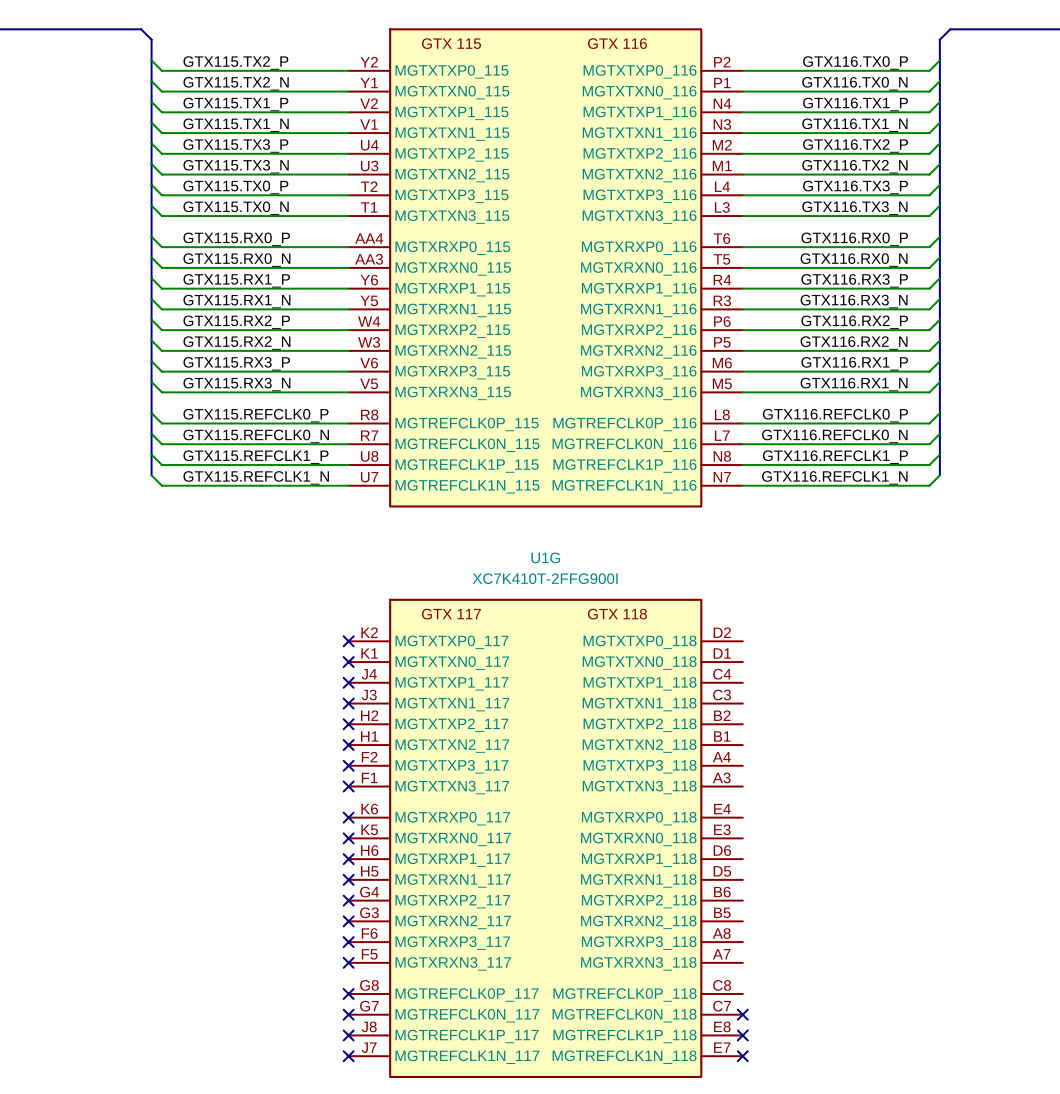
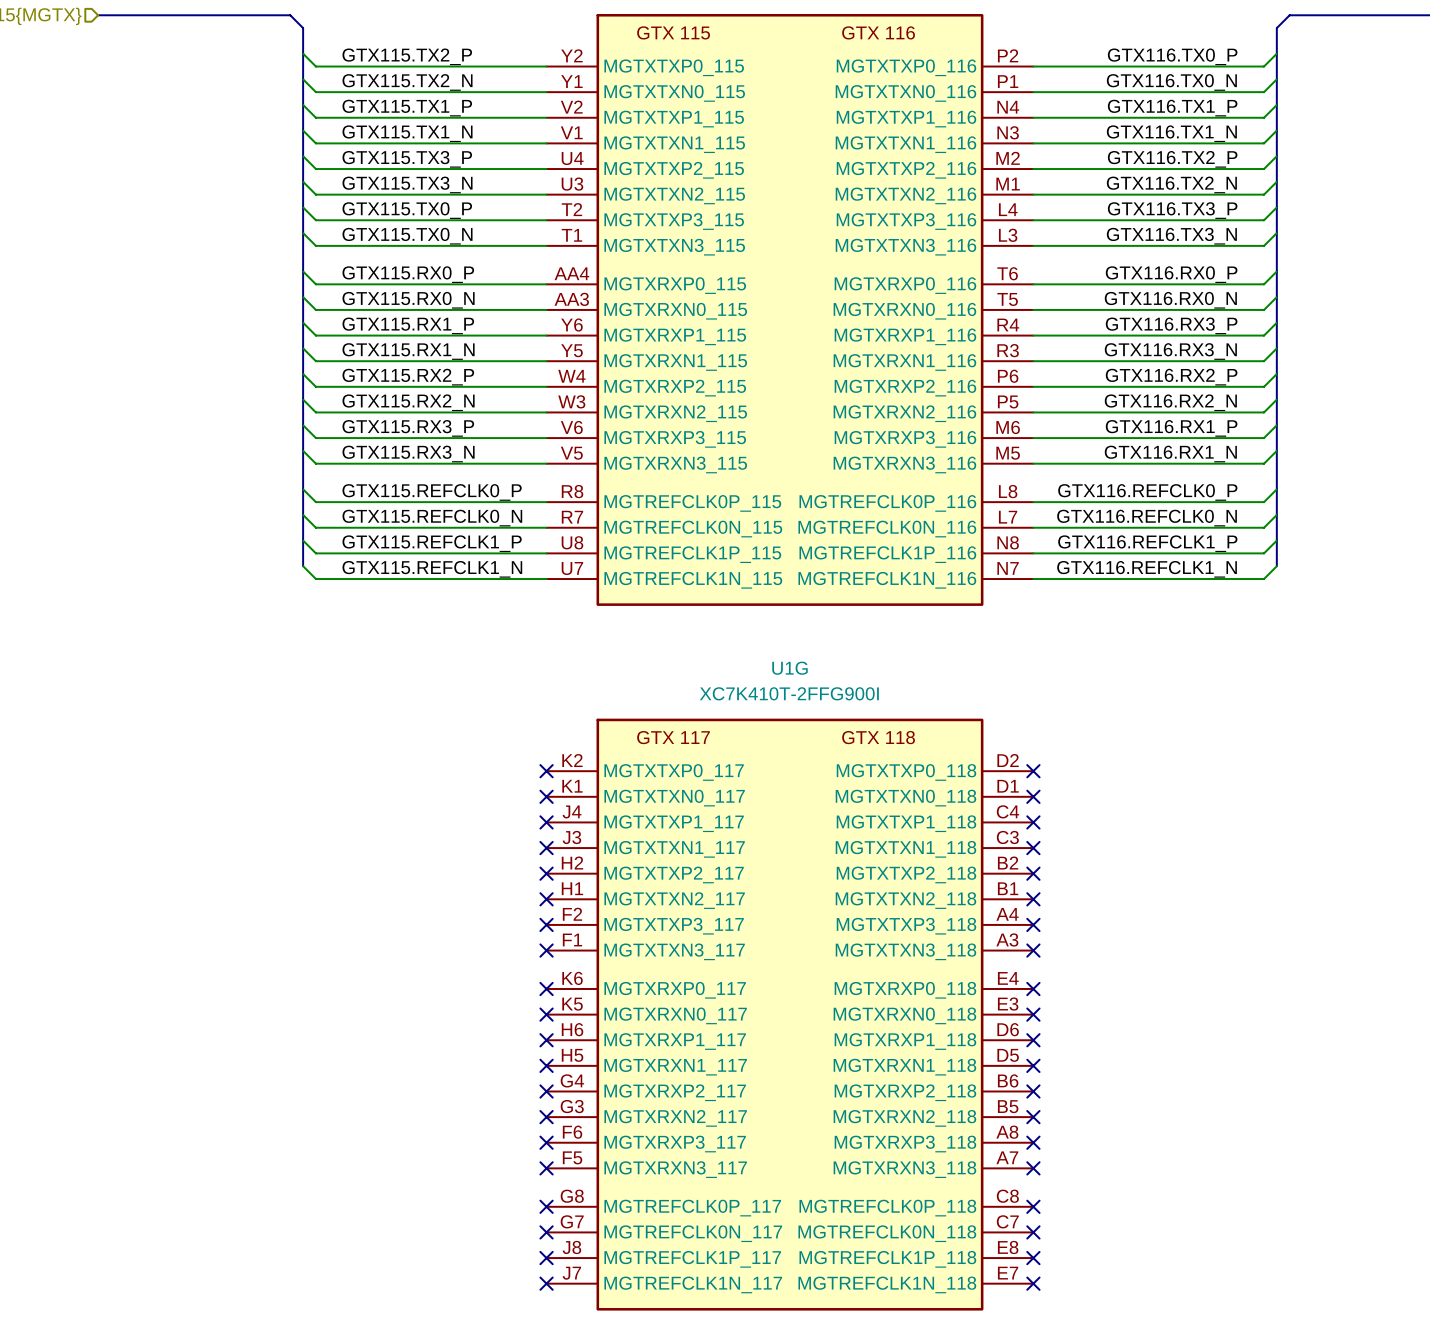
no-connect mark: none -> (1033, 771)
no-connect mark: none -> (1033, 796)
no-connect mark: none -> (1033, 822)
no-connect mark: none -> (1033, 848)
no-connect mark: none -> (1033, 873)
no-connect mark: none -> (1033, 899)
no-connect mark: none -> (1033, 924)
no-connect mark: none -> (1033, 950)
no-connect mark: none -> (1033, 988)
no-connect mark: none -> (1033, 1014)
no-connect mark: none -> (1033, 1040)
no-connect mark: none -> (1033, 1065)
no-connect mark: none -> (1033, 1091)
no-connect mark: none -> (1033, 1117)
no-connect mark: none -> (1033, 1142)
no-connect mark: none -> (1033, 1168)
no-connect mark: none -> (1033, 1206)

